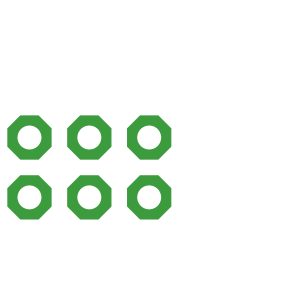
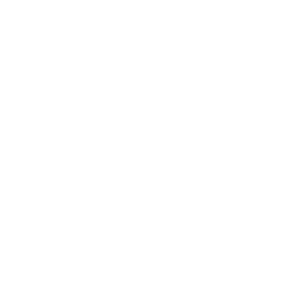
part: (89, 167) -> none

